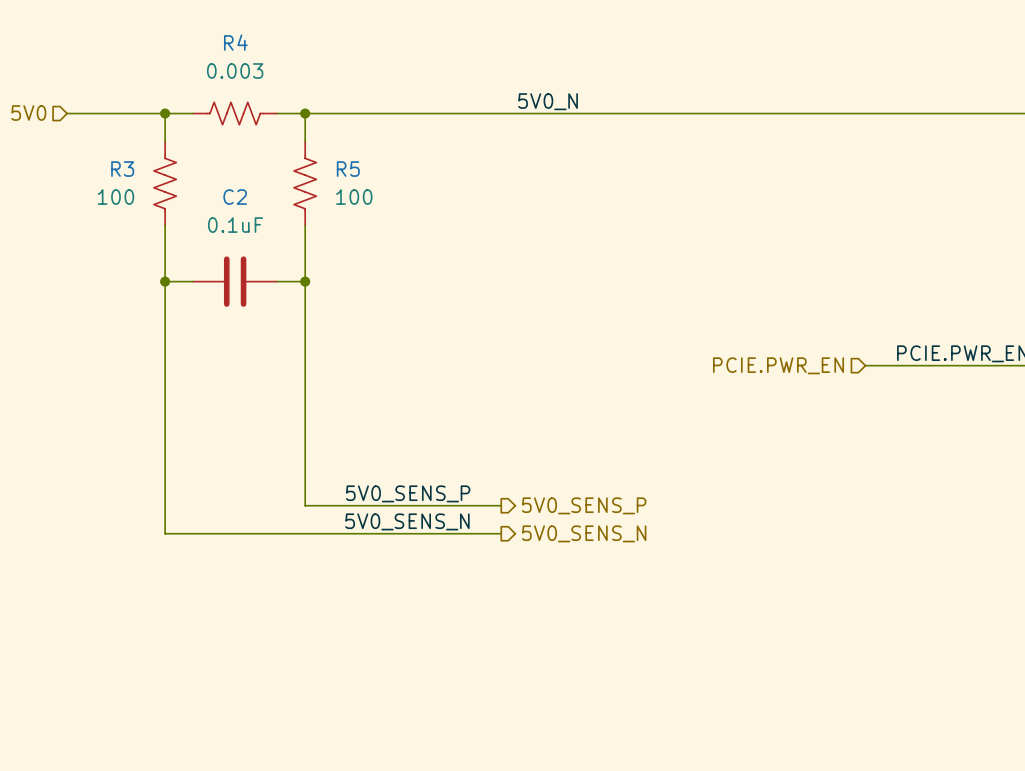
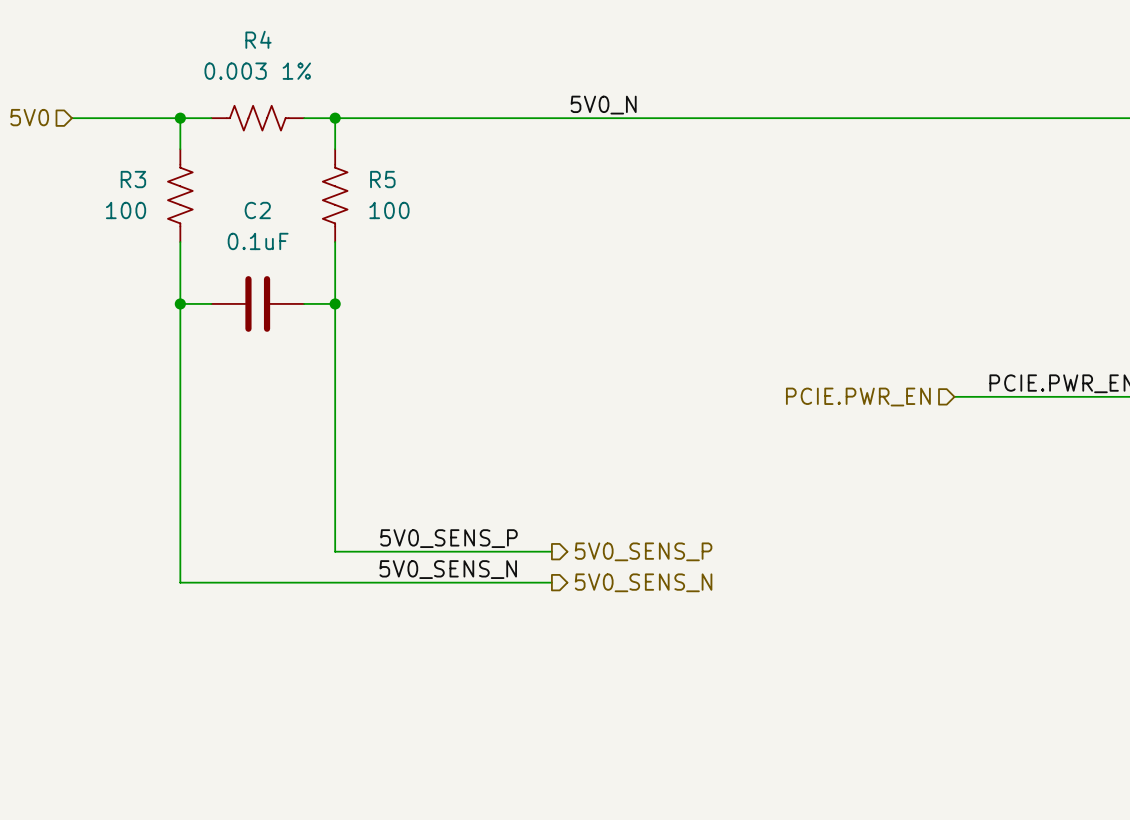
R4 value: 0.003 (235, 70) -> 0.003 1% (257, 71)

